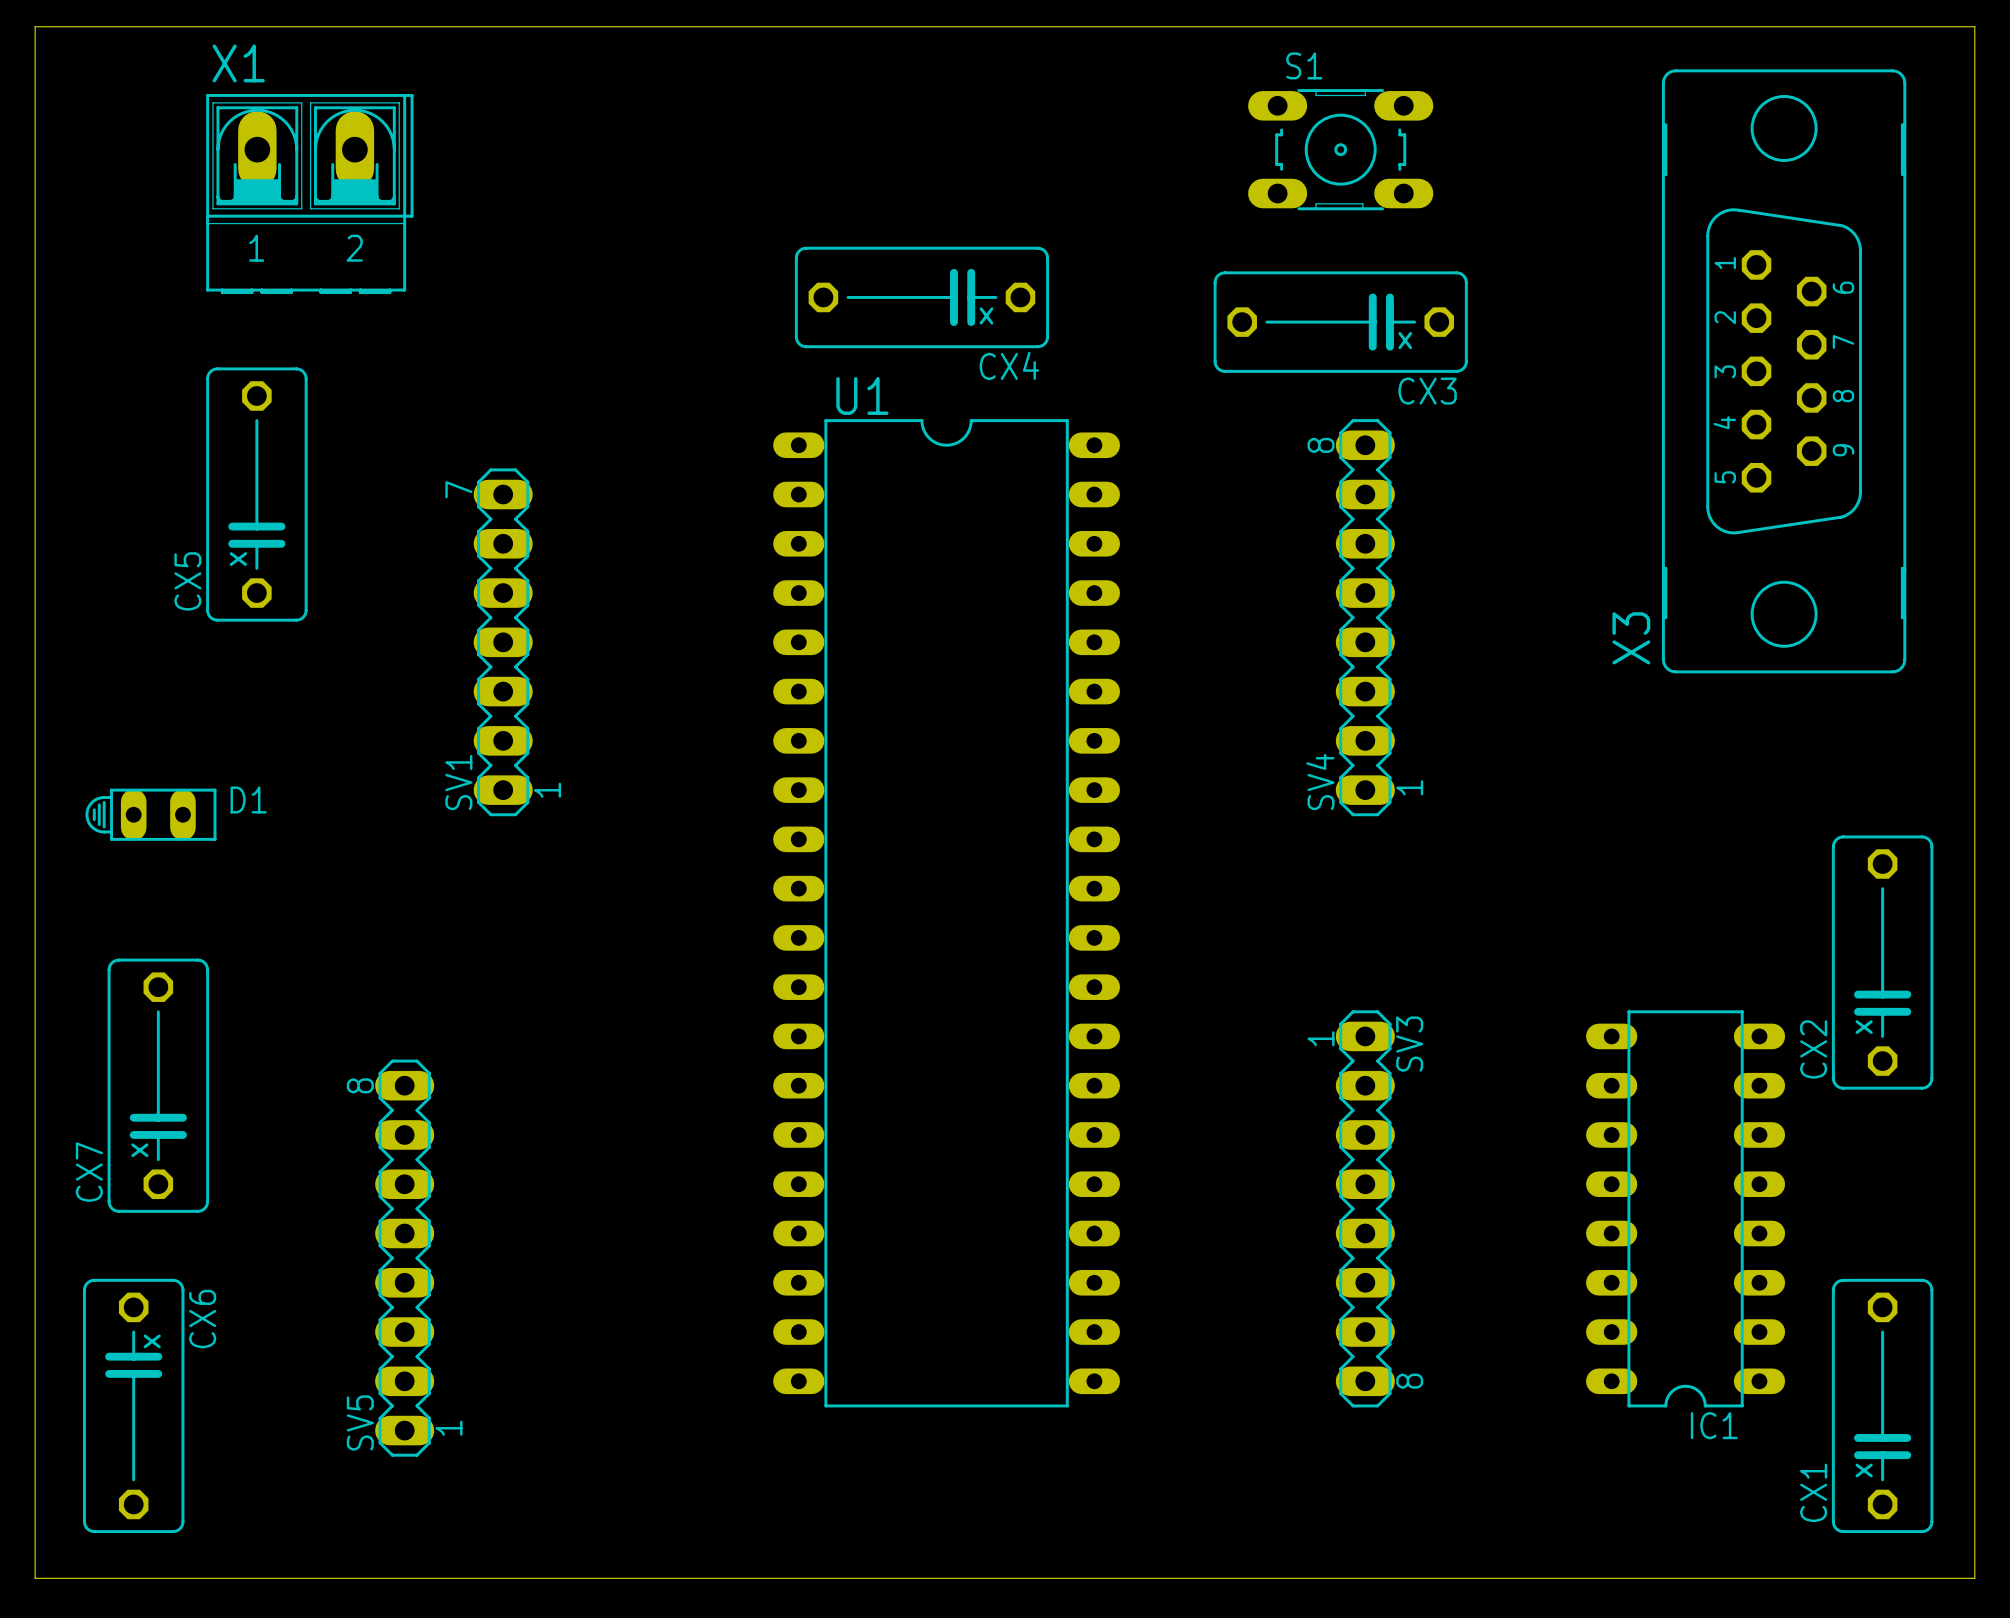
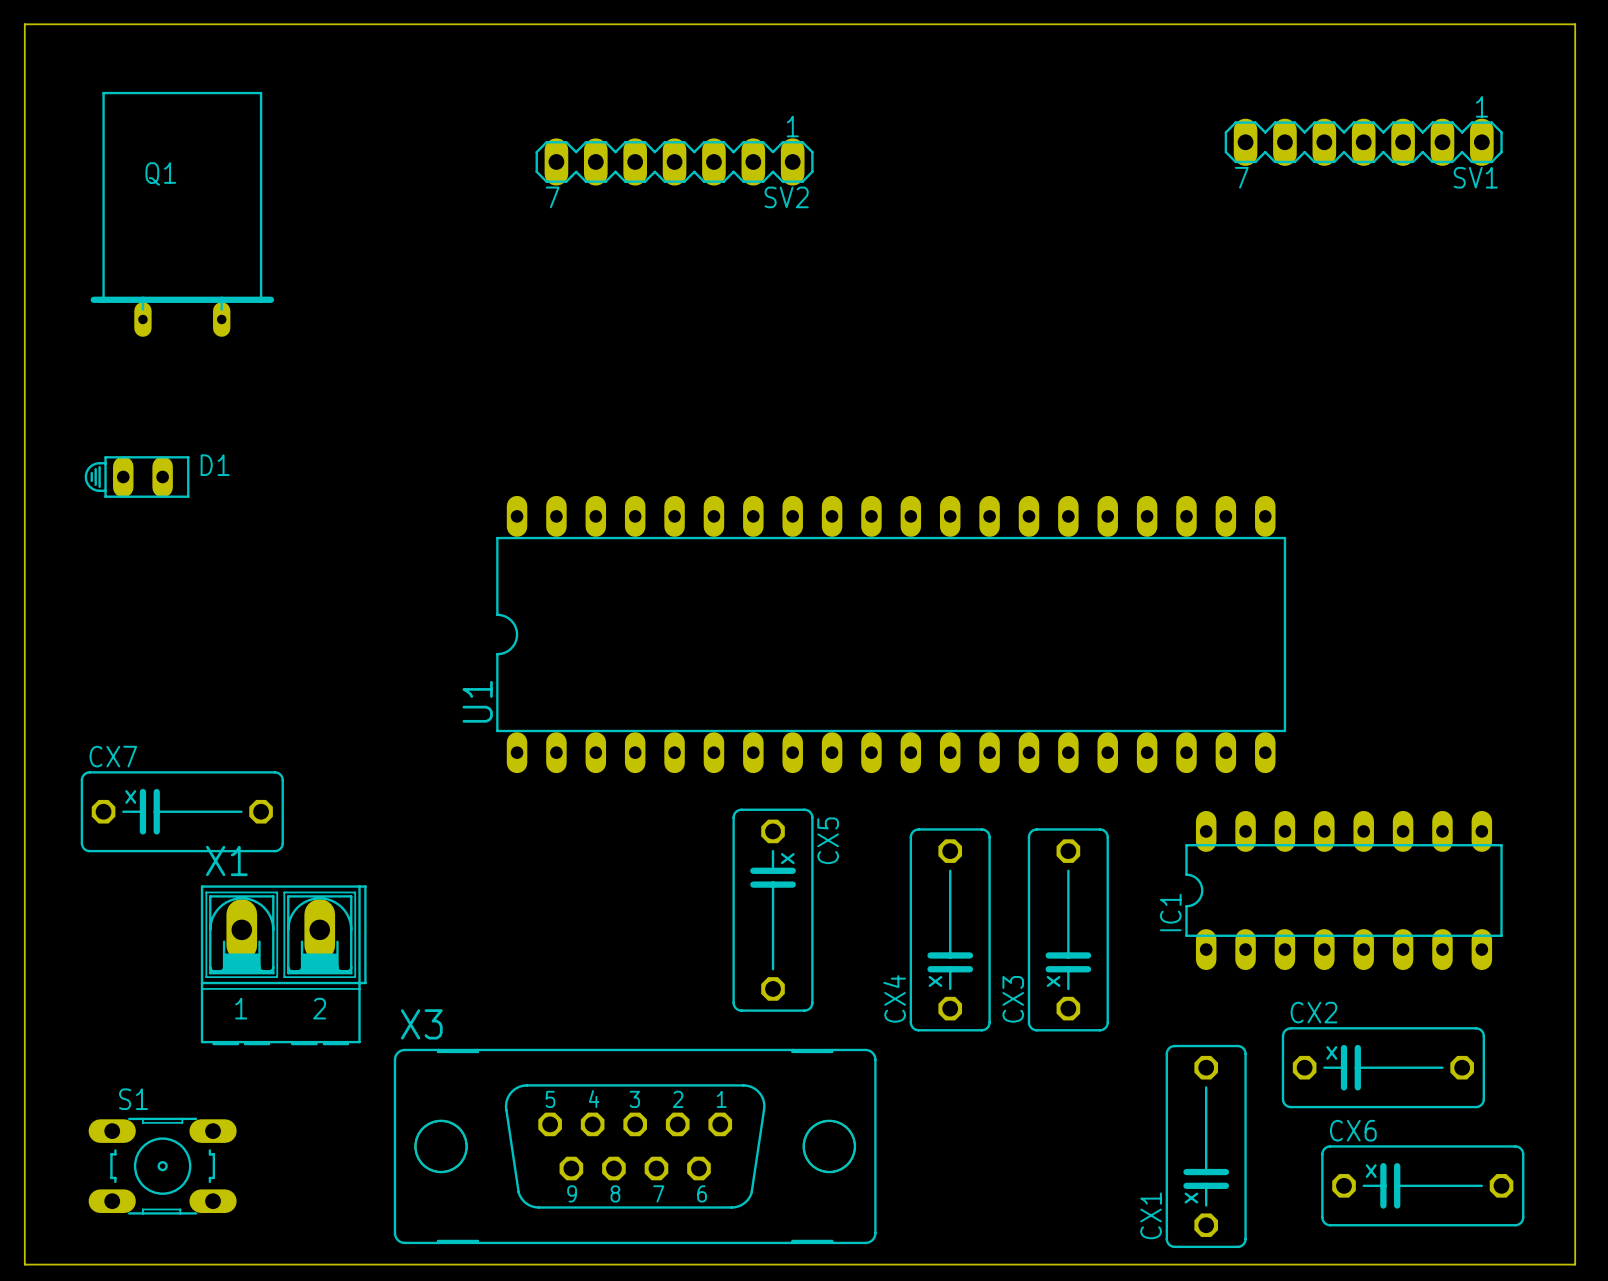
S1 position: (1340, 149) -> (162, 1166)
X1 position: (309, 194) -> (283, 965)
SV2: none -> (674, 161)
Q1: none -> (182, 214)
CX4 rotation: 0° (921, 297) -> 90° clockwise (950, 929)
CX4 position: (921, 297) -> (950, 929)
CX3 rotation: 0° (1340, 322) -> 90° clockwise (1068, 929)
CX3 position: (1340, 322) -> (1068, 929)
X3 rotation: 0° (1784, 371) -> 90° clockwise (635, 1146)
X3 position: (1784, 371) -> (635, 1146)
SV1 footprint: [473, 468, 533, 817] -> [1224, 118, 1503, 166]
CX5 rotation: 0° (256, 494) -> 180° (773, 910)
CX5 position: (256, 494) -> (773, 910)
SV4: (1365, 617) -> none
SV1 name position: SV1 (458, 782) -> SV1 (1475, 177)
D1 position: (150, 814) -> (137, 477)
U1 rotation: 0° (946, 913) -> 90° counterclockwise (891, 634)
CX2 rotation: 0° (1882, 962) -> 90° clockwise (1383, 1067)
CX2 position: (1882, 962) -> (1383, 1067)
CX7 rotation: 0° (158, 1085) -> 90° clockwise (182, 811)
SV3: (1365, 1208) -> none
IC1 rotation: 0° (1685, 1208) -> 90° clockwise (1344, 890)
SV5: (404, 1258) -> none
CX6 rotation: 0° (133, 1405) -> 90° counterclockwise (1422, 1185)
CX6 position: (133, 1405) -> (1422, 1185)
CX1 position: (1882, 1405) -> (1206, 1146)

